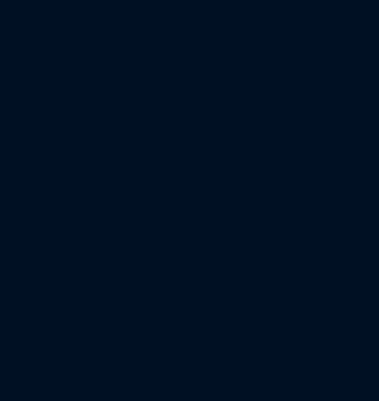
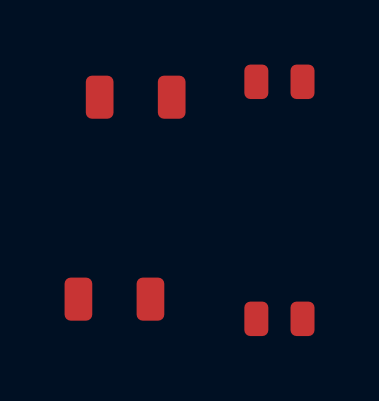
part: none -> (279, 81)
part: none -> (135, 97)
part: none -> (114, 299)
part: none -> (279, 318)

